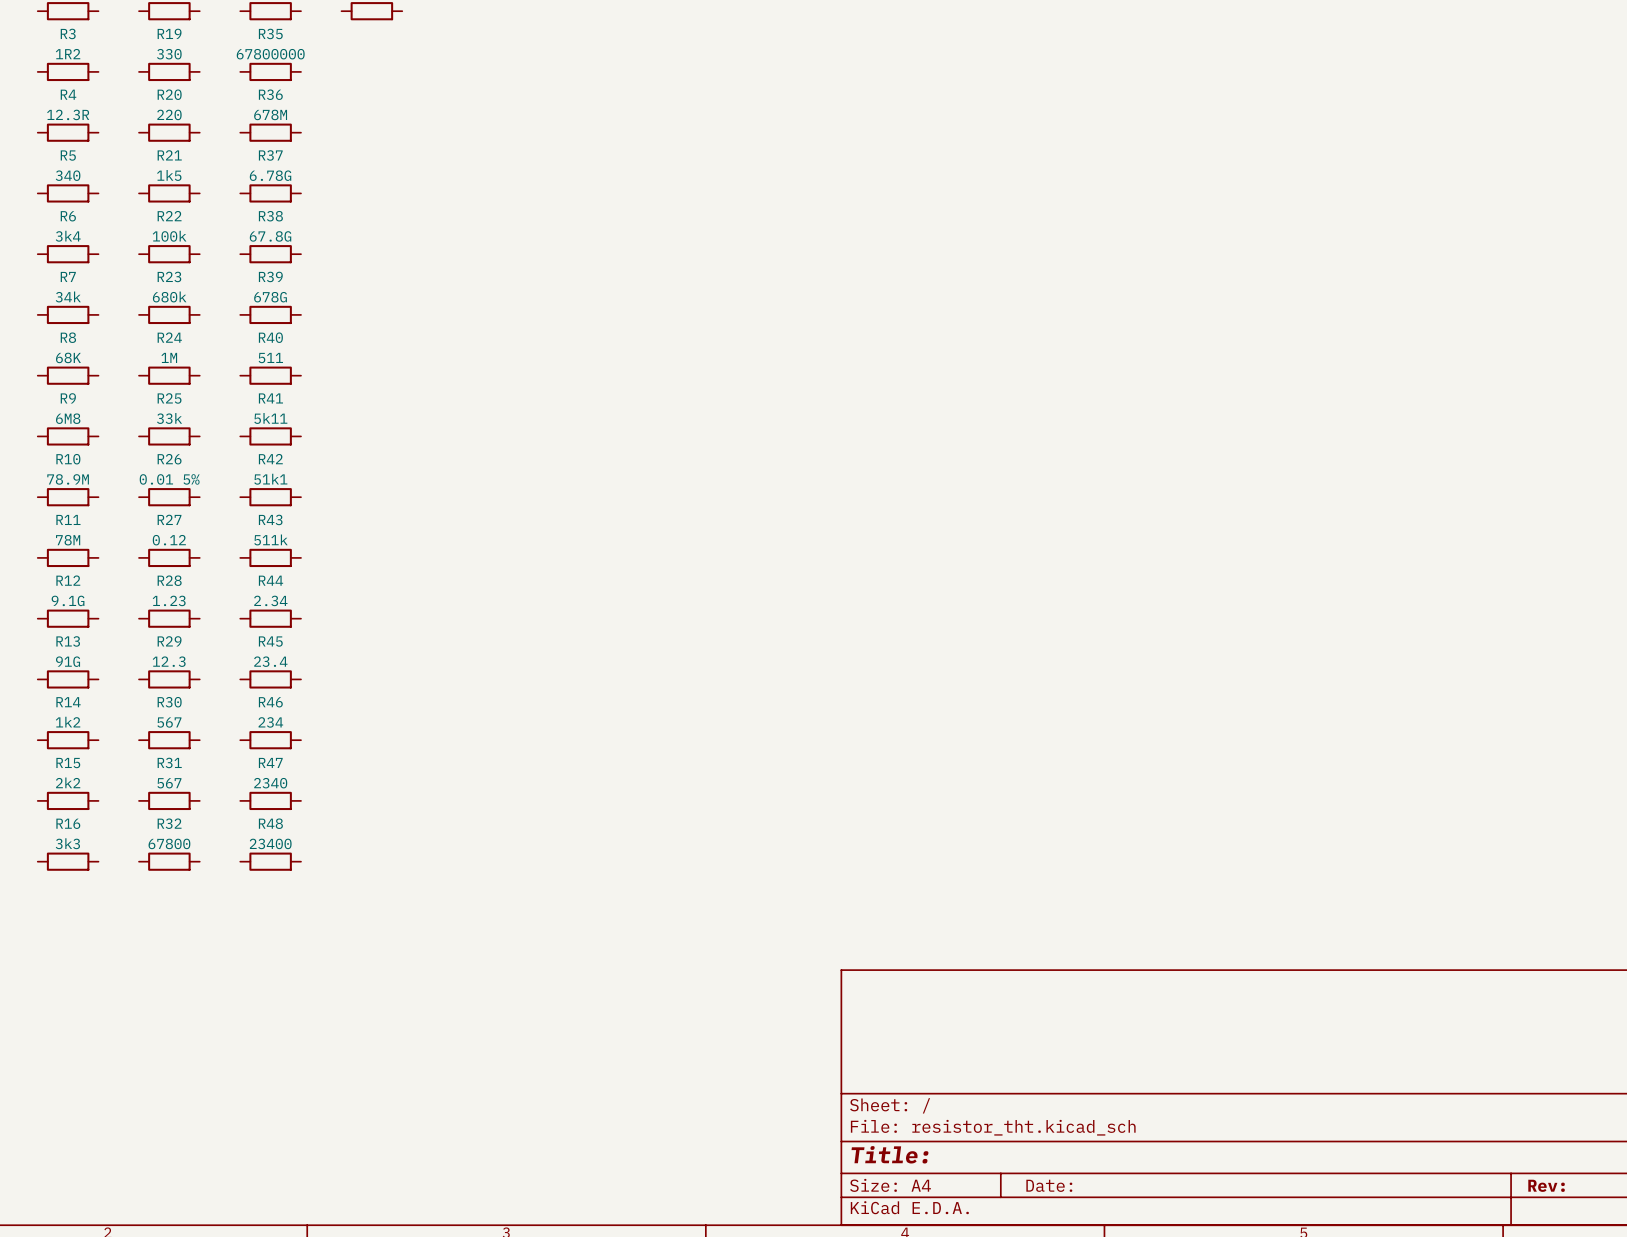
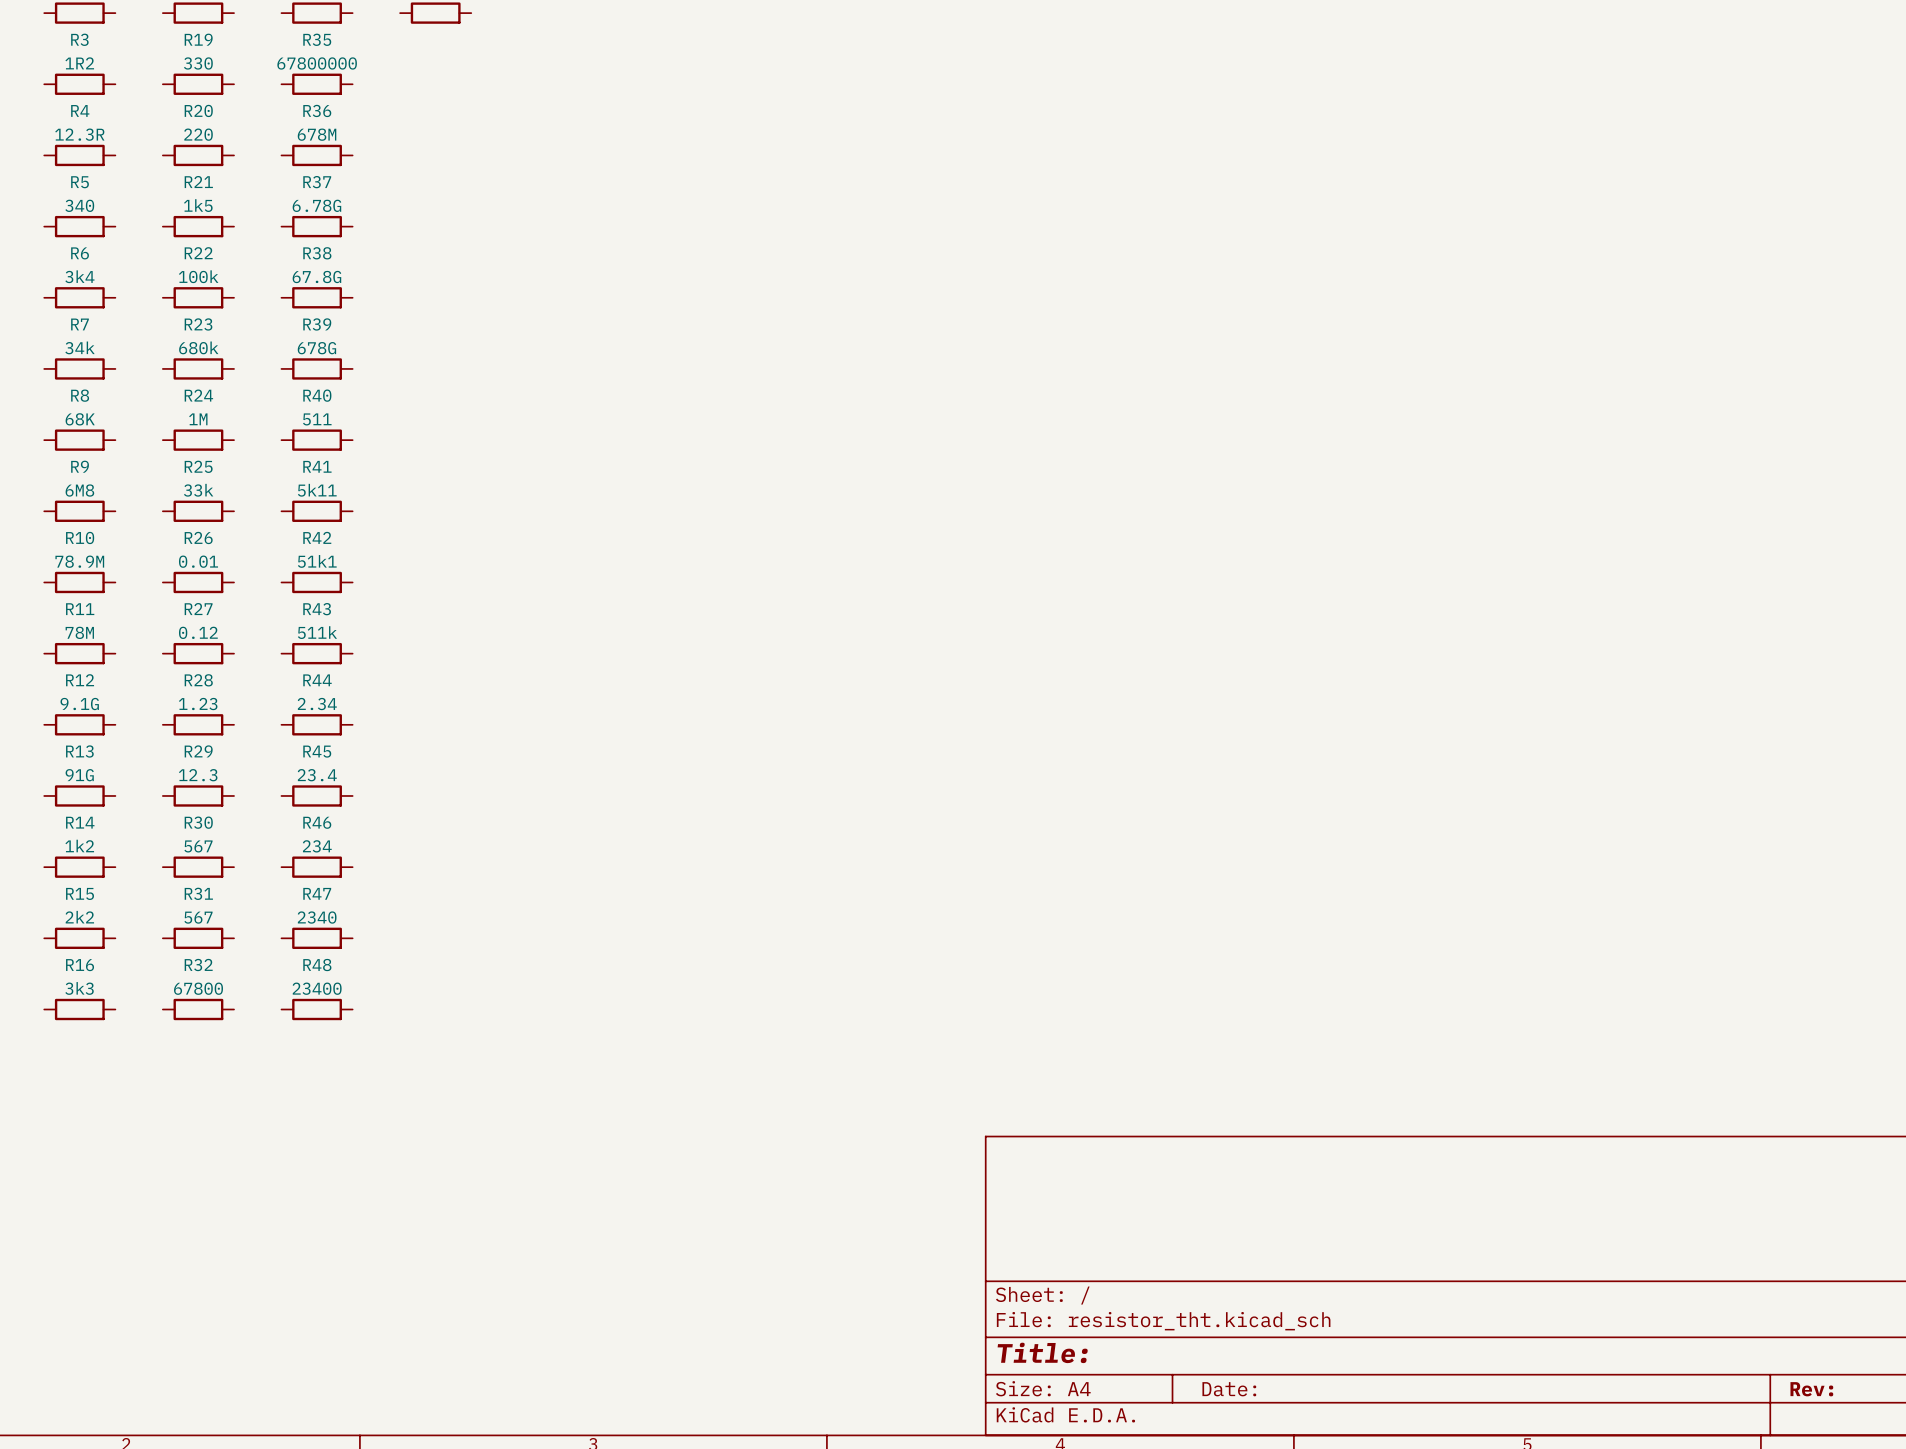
R26 value: 0.01 5% (169, 479) -> 0.01 (198, 561)

